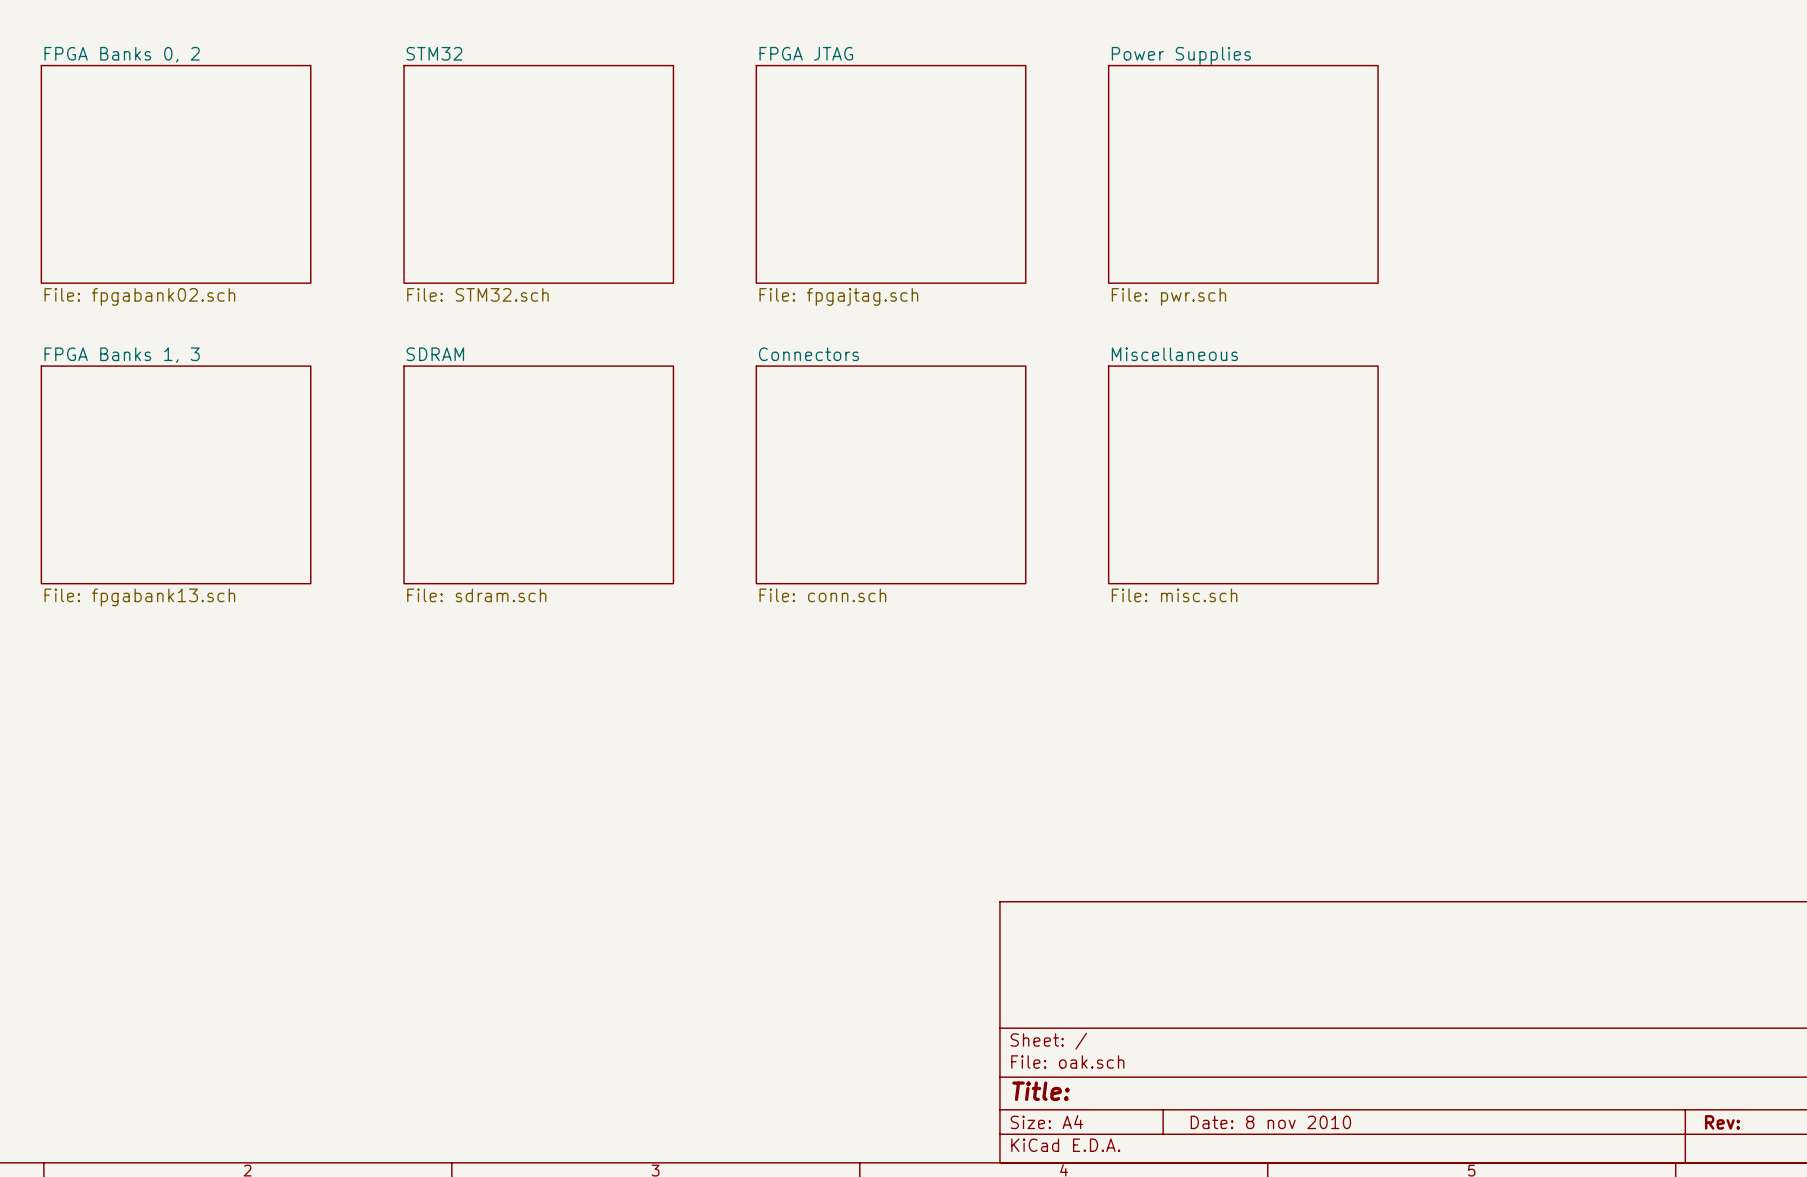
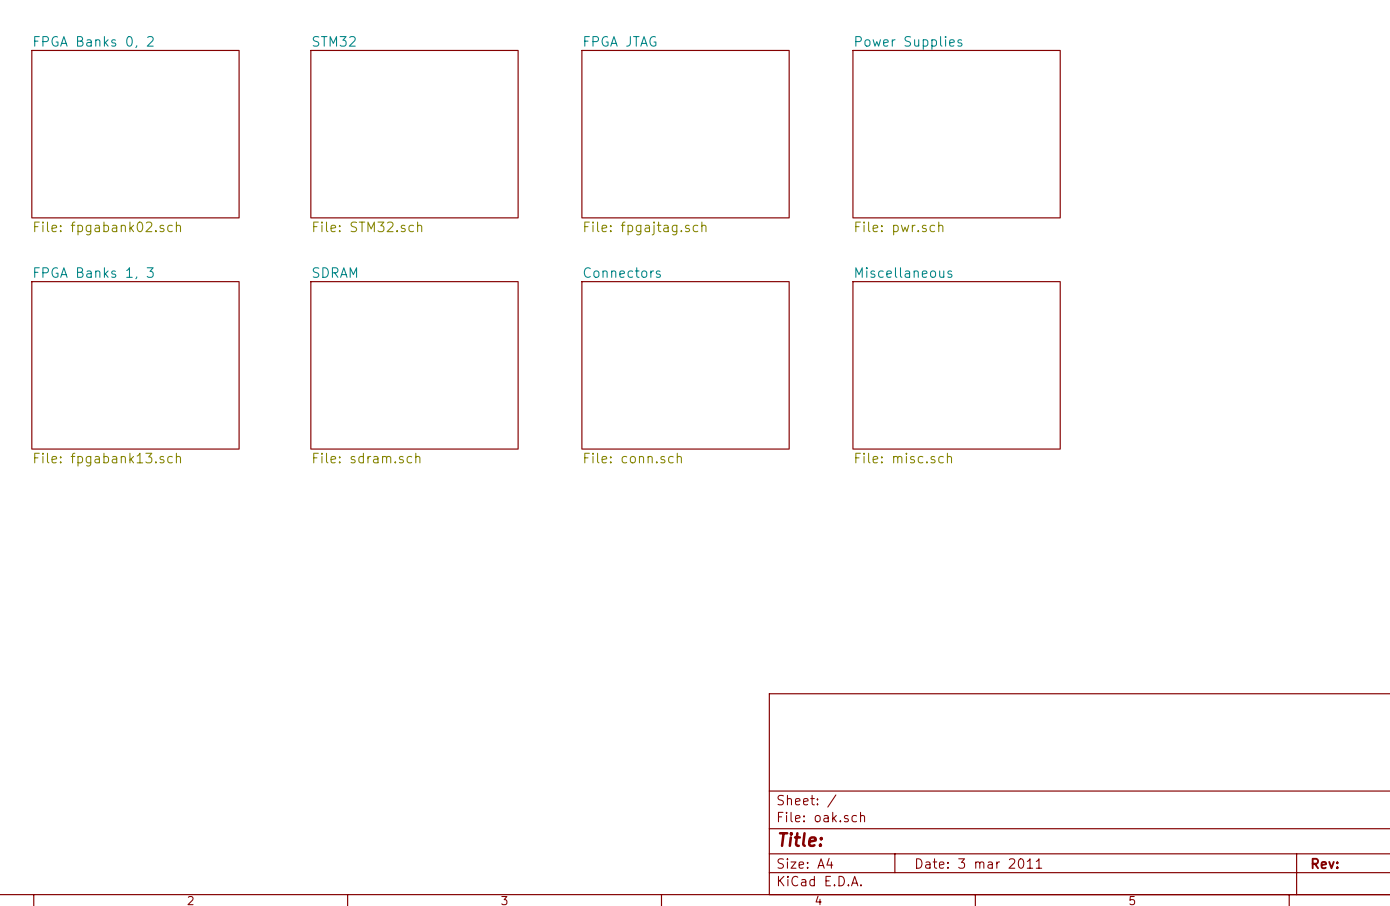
title block: Date: 8 nov 2010 (1270, 1122) -> Date: 3 mar 2011 (979, 863)

